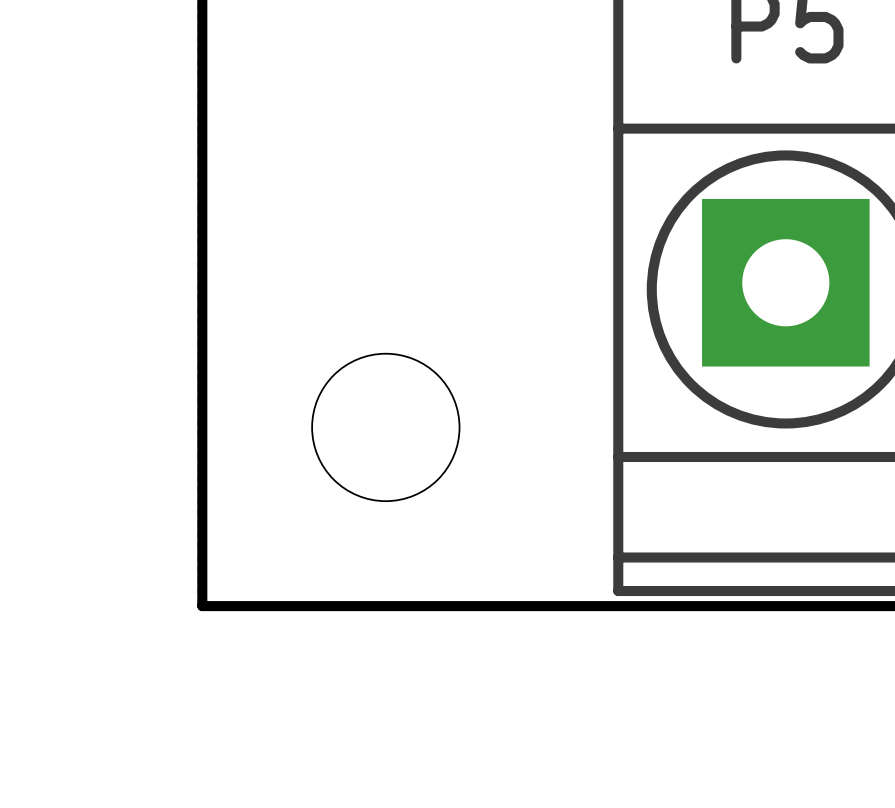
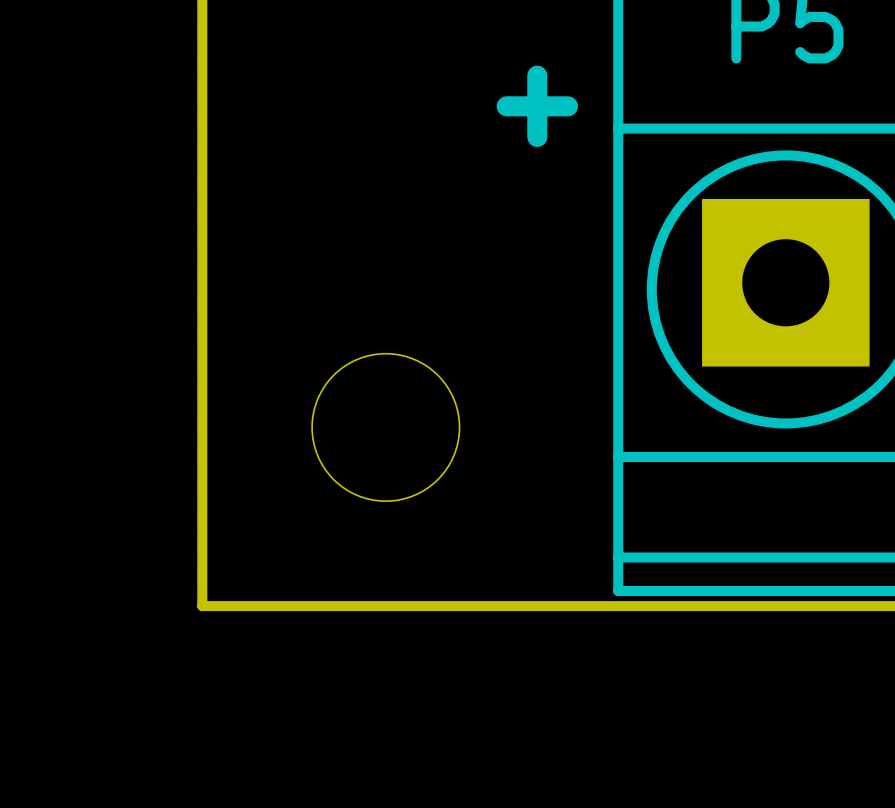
text: none -> + (537, 106)

